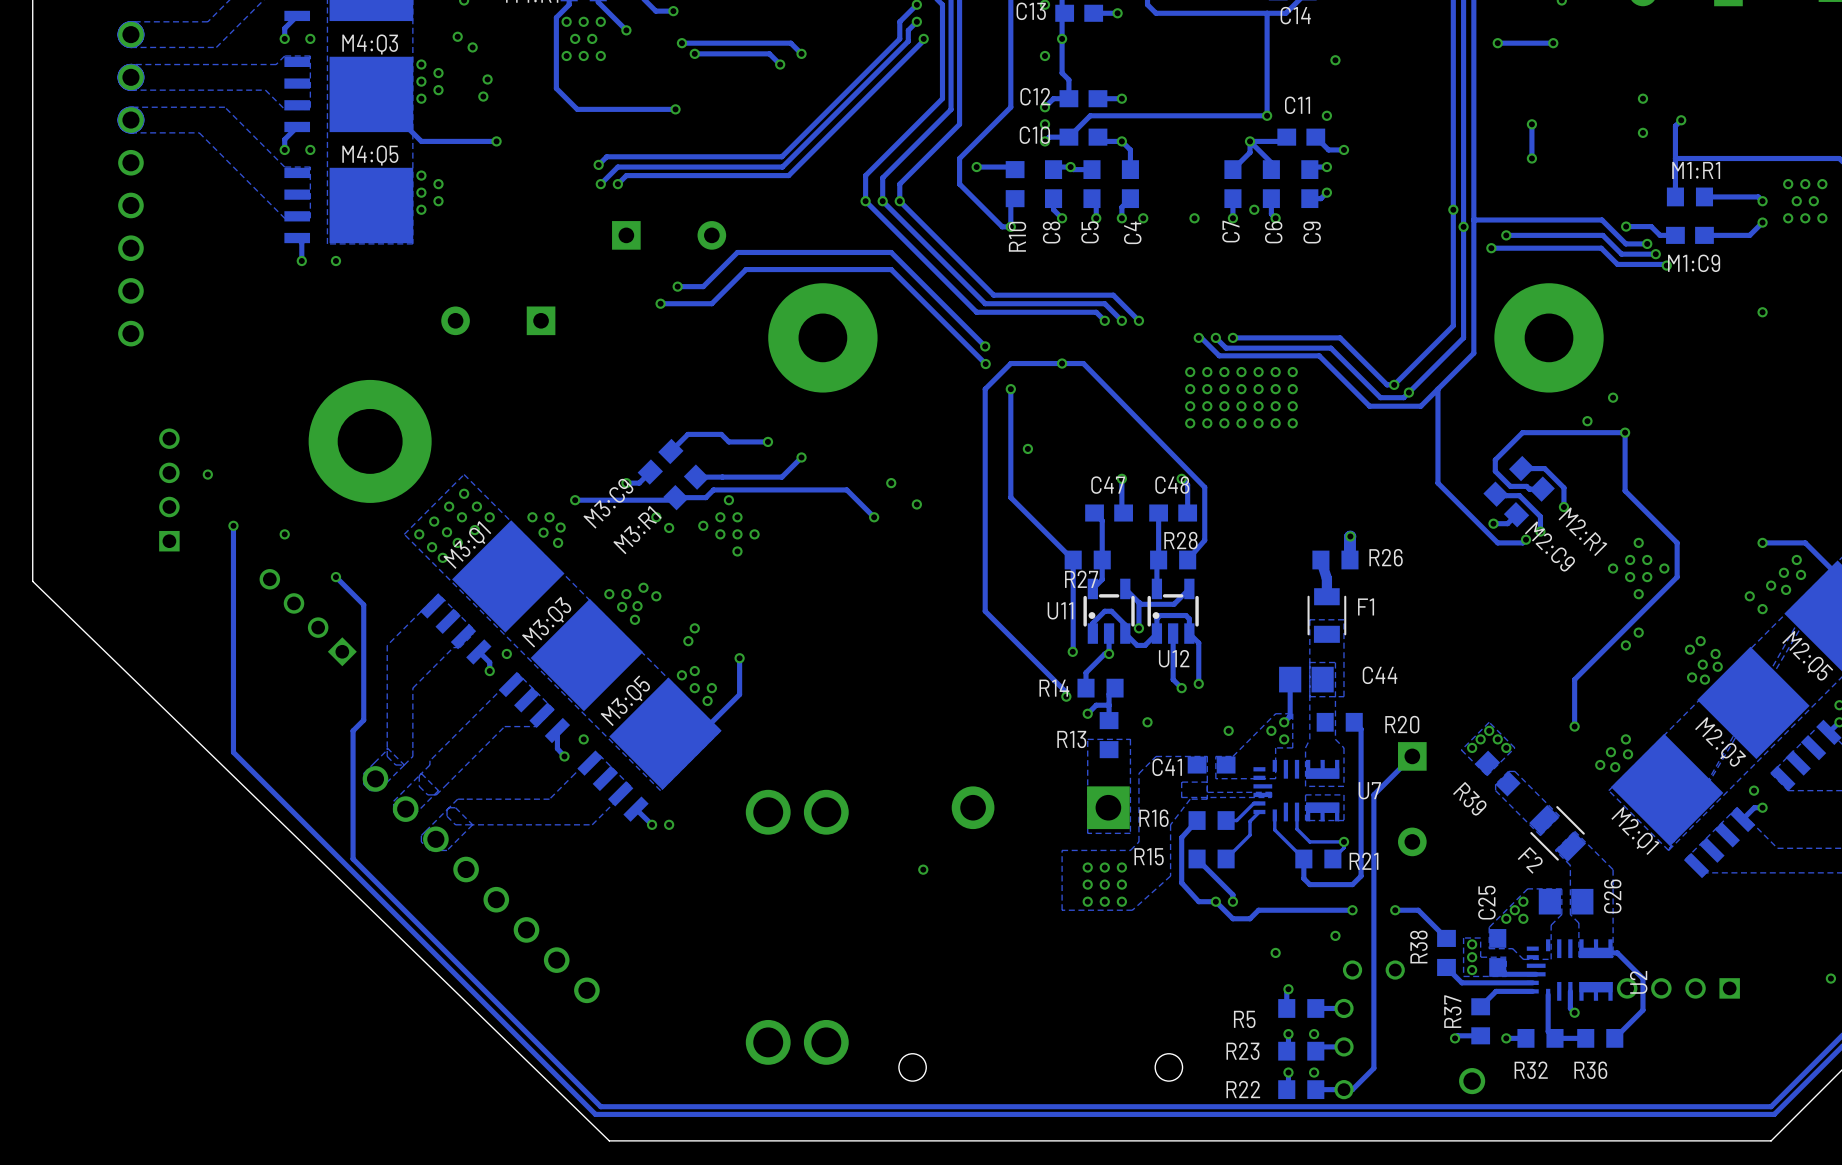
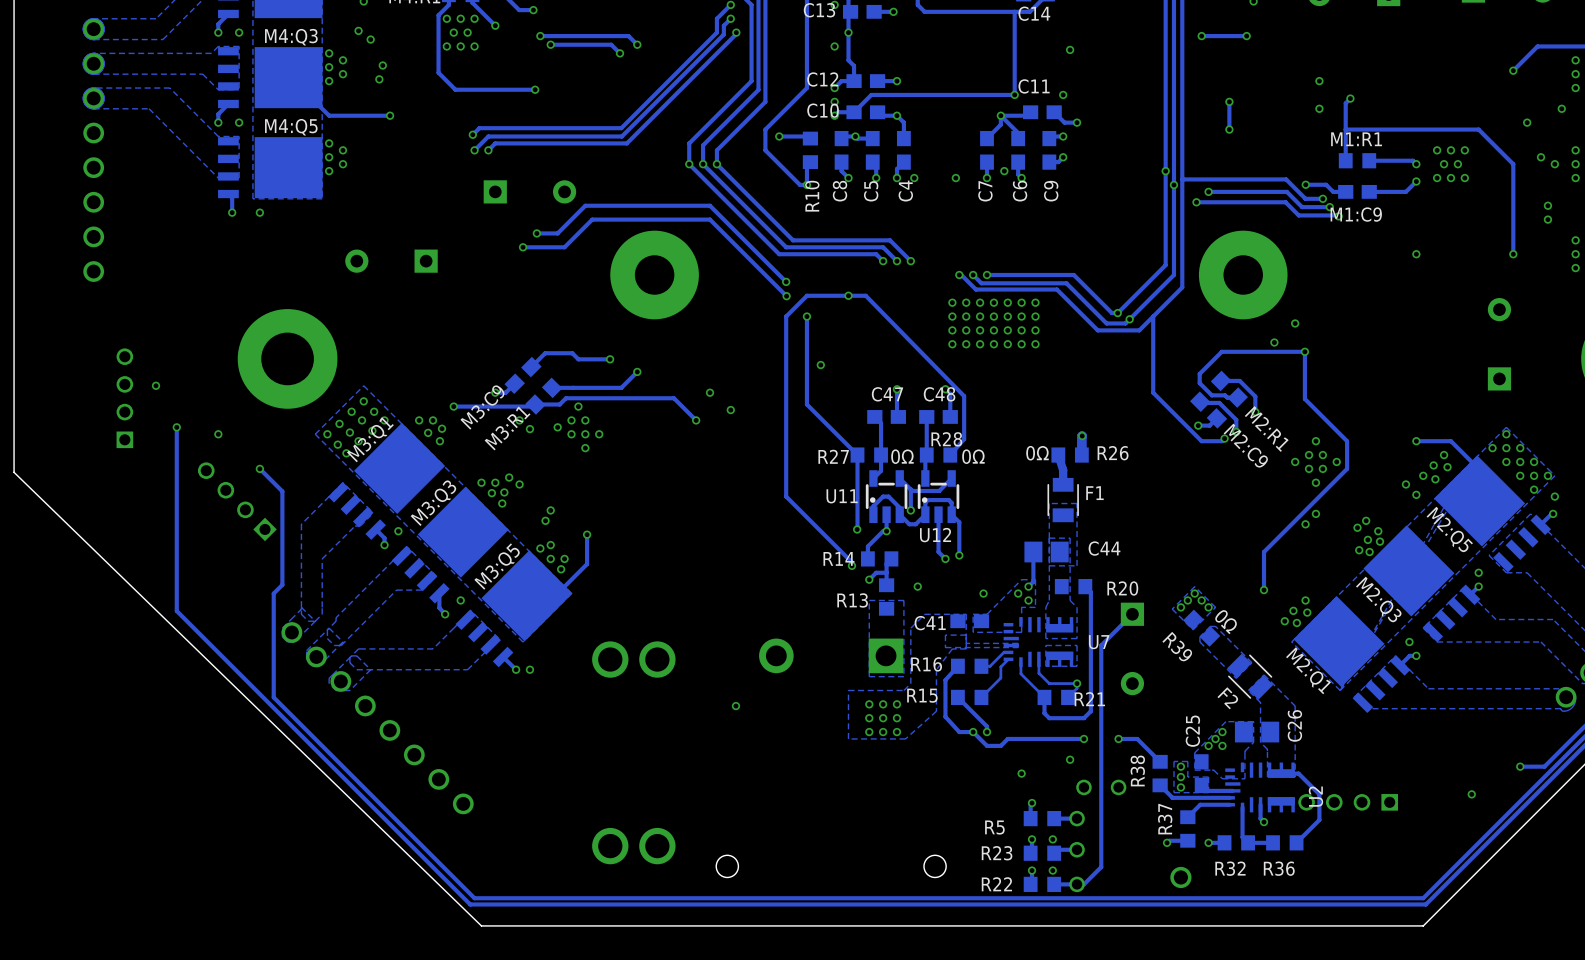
text: none -> 0Ω (1037, 453)
text: none -> 0Ω (902, 456)
text: none -> 0Ω (973, 456)
R27 name position: R27 (1081, 579) -> R27 (833, 456)
text: none -> 0Ω (1225, 621)

